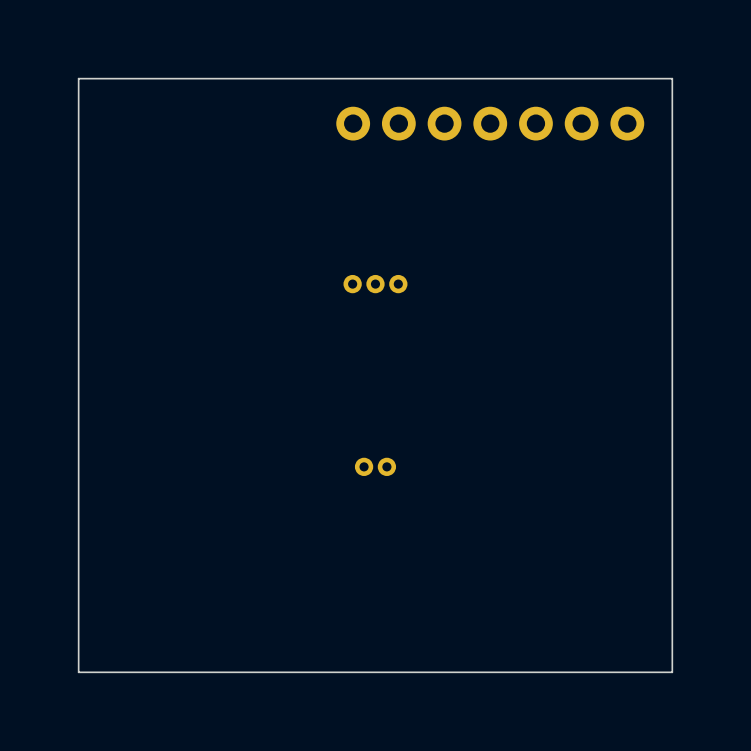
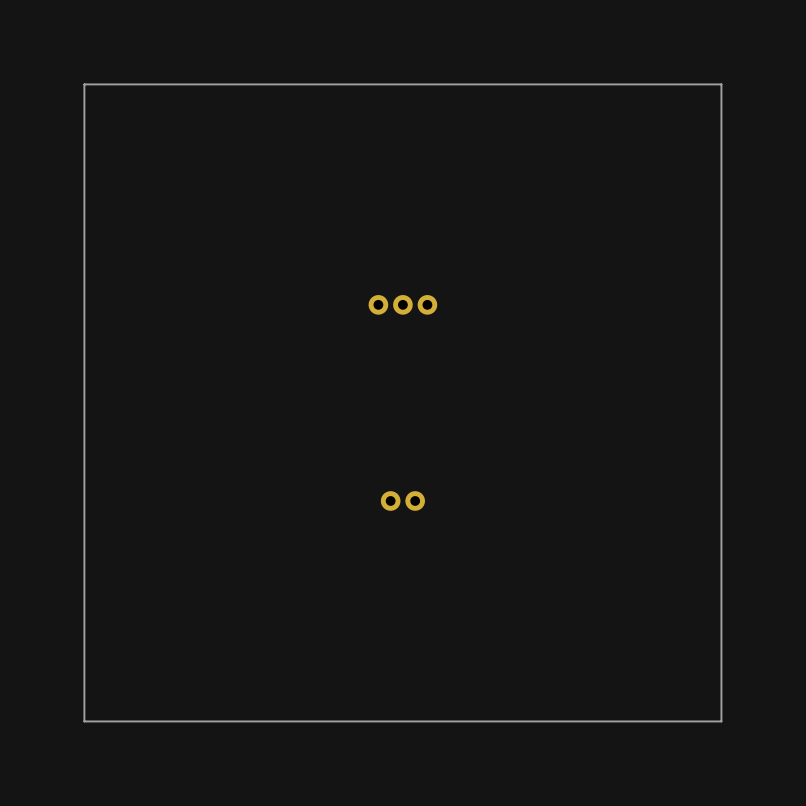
part: (490, 123) -> none

